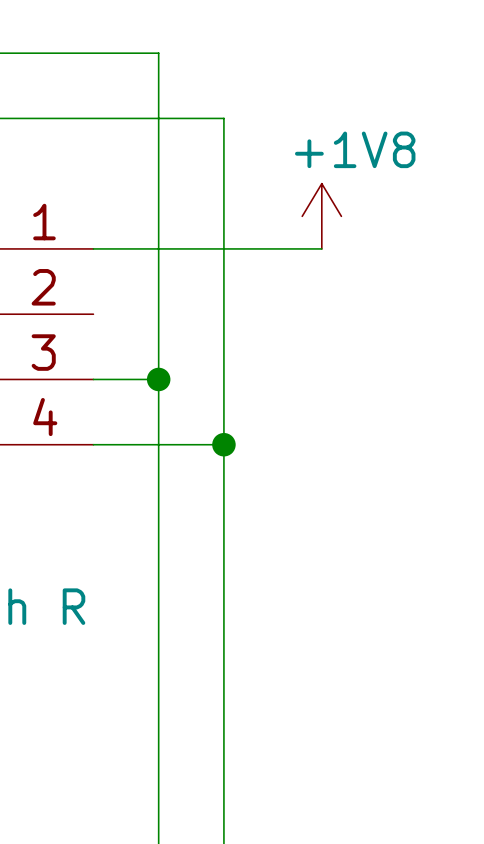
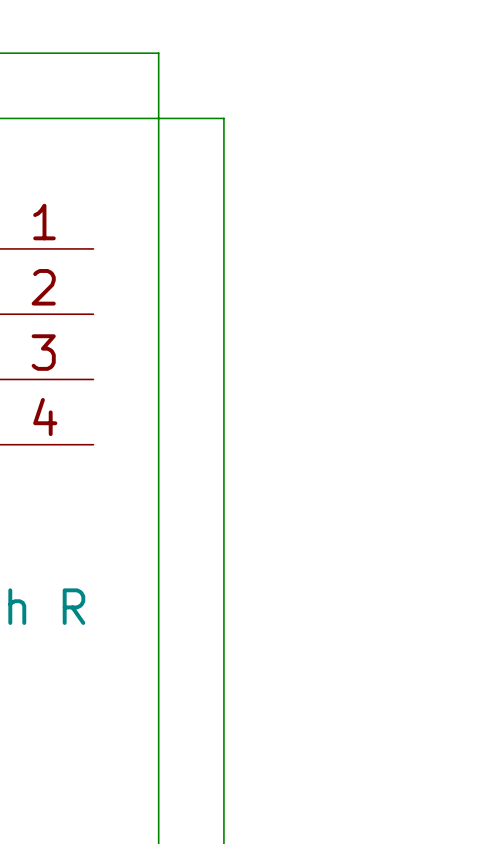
power symbol: +1V8 (321, 216) -> none
wire: (93, 248) (321, 248) -> none
wire: (93, 379) (158, 379) -> none
junction: (158, 379) -> none
wire: (93, 444) (223, 444) -> none
junction: (223, 444) -> none

